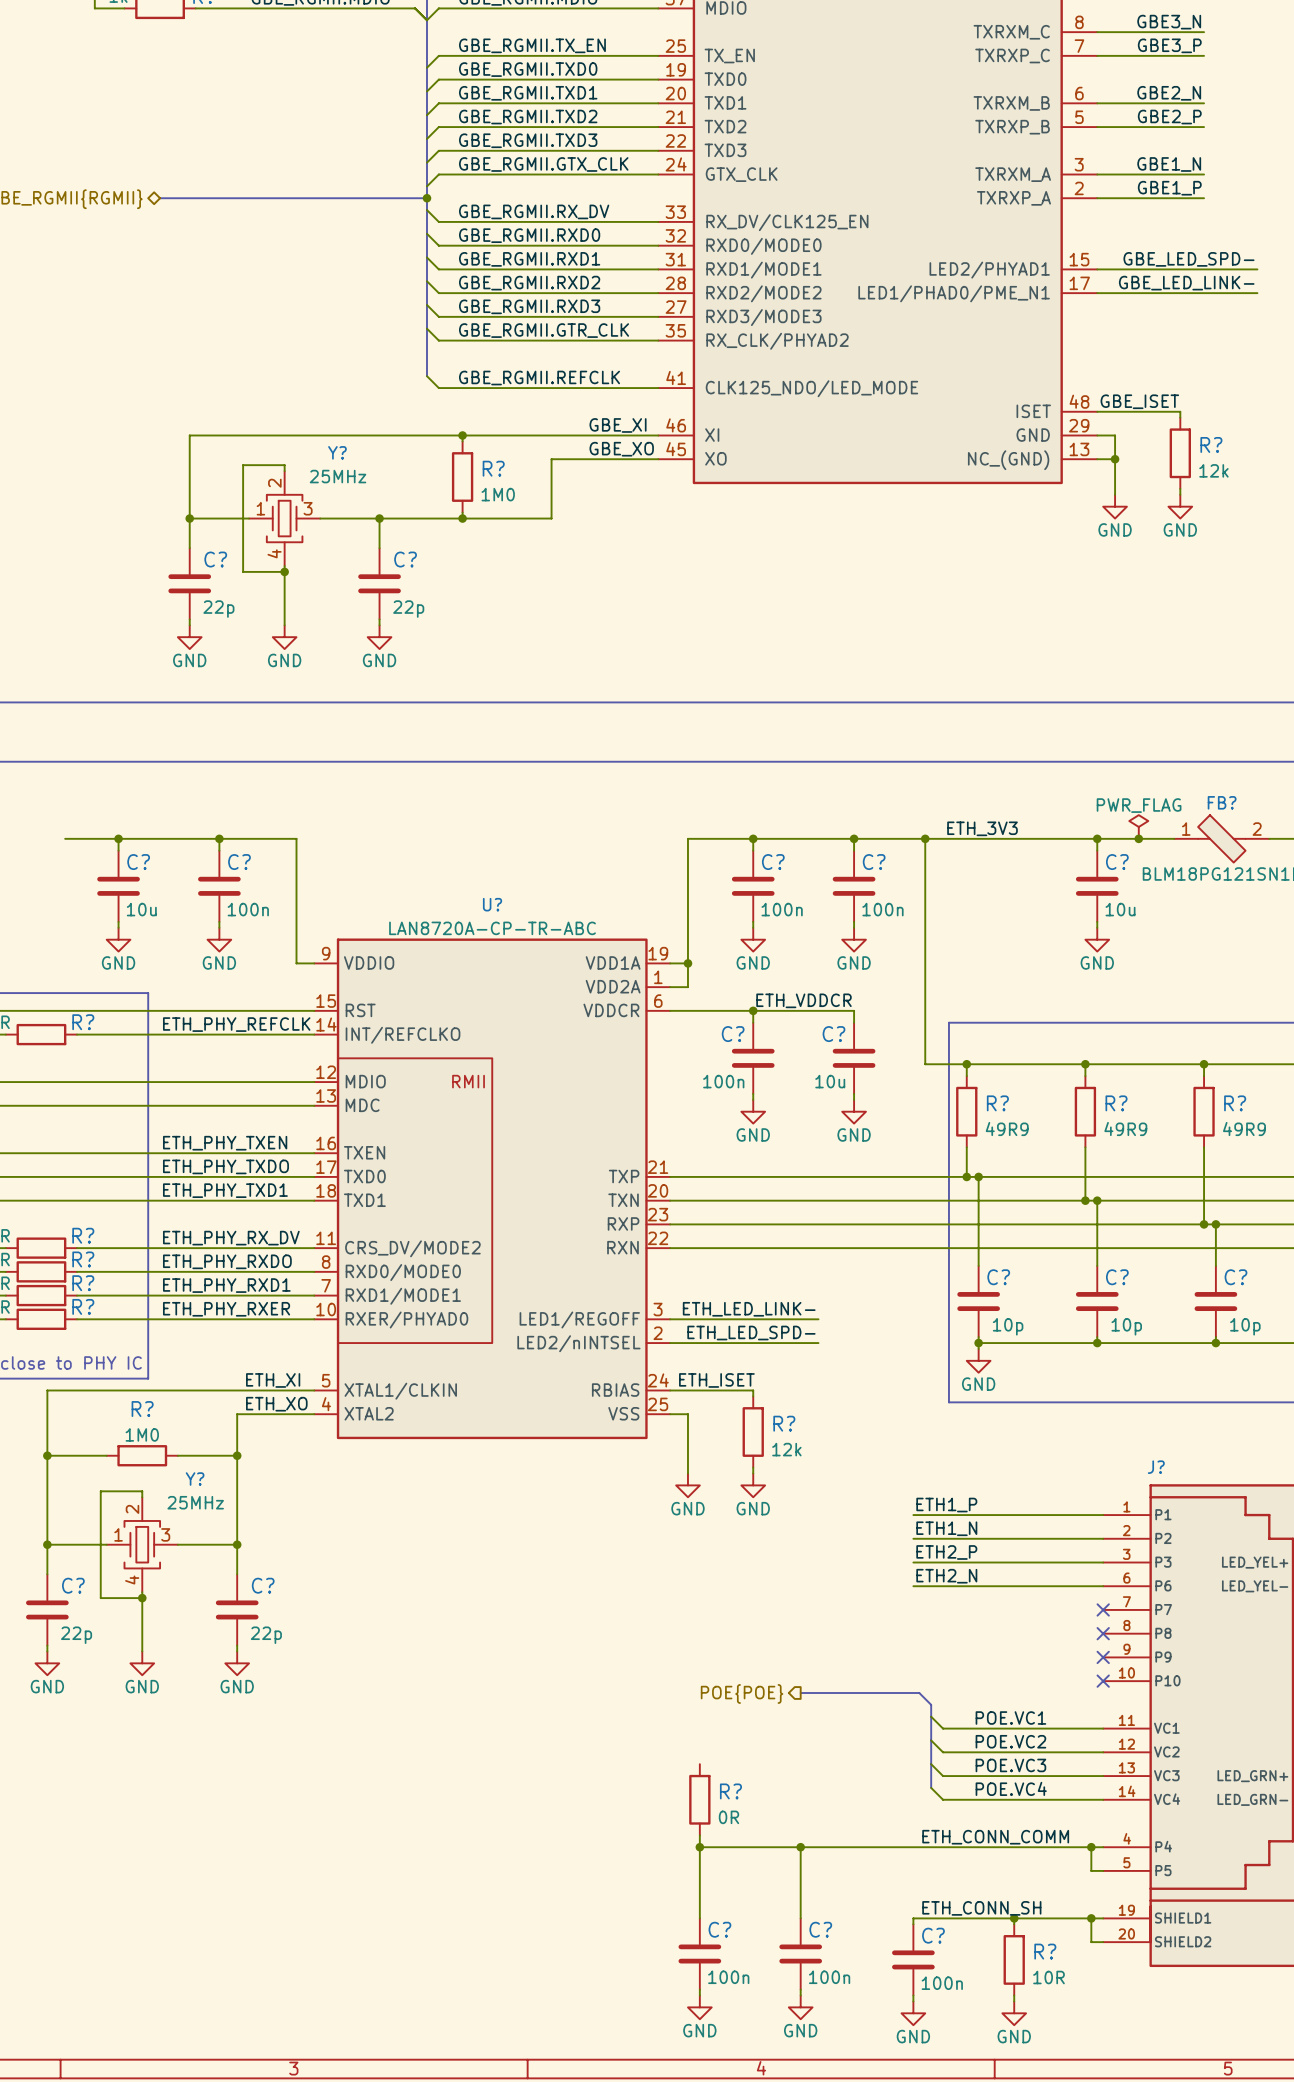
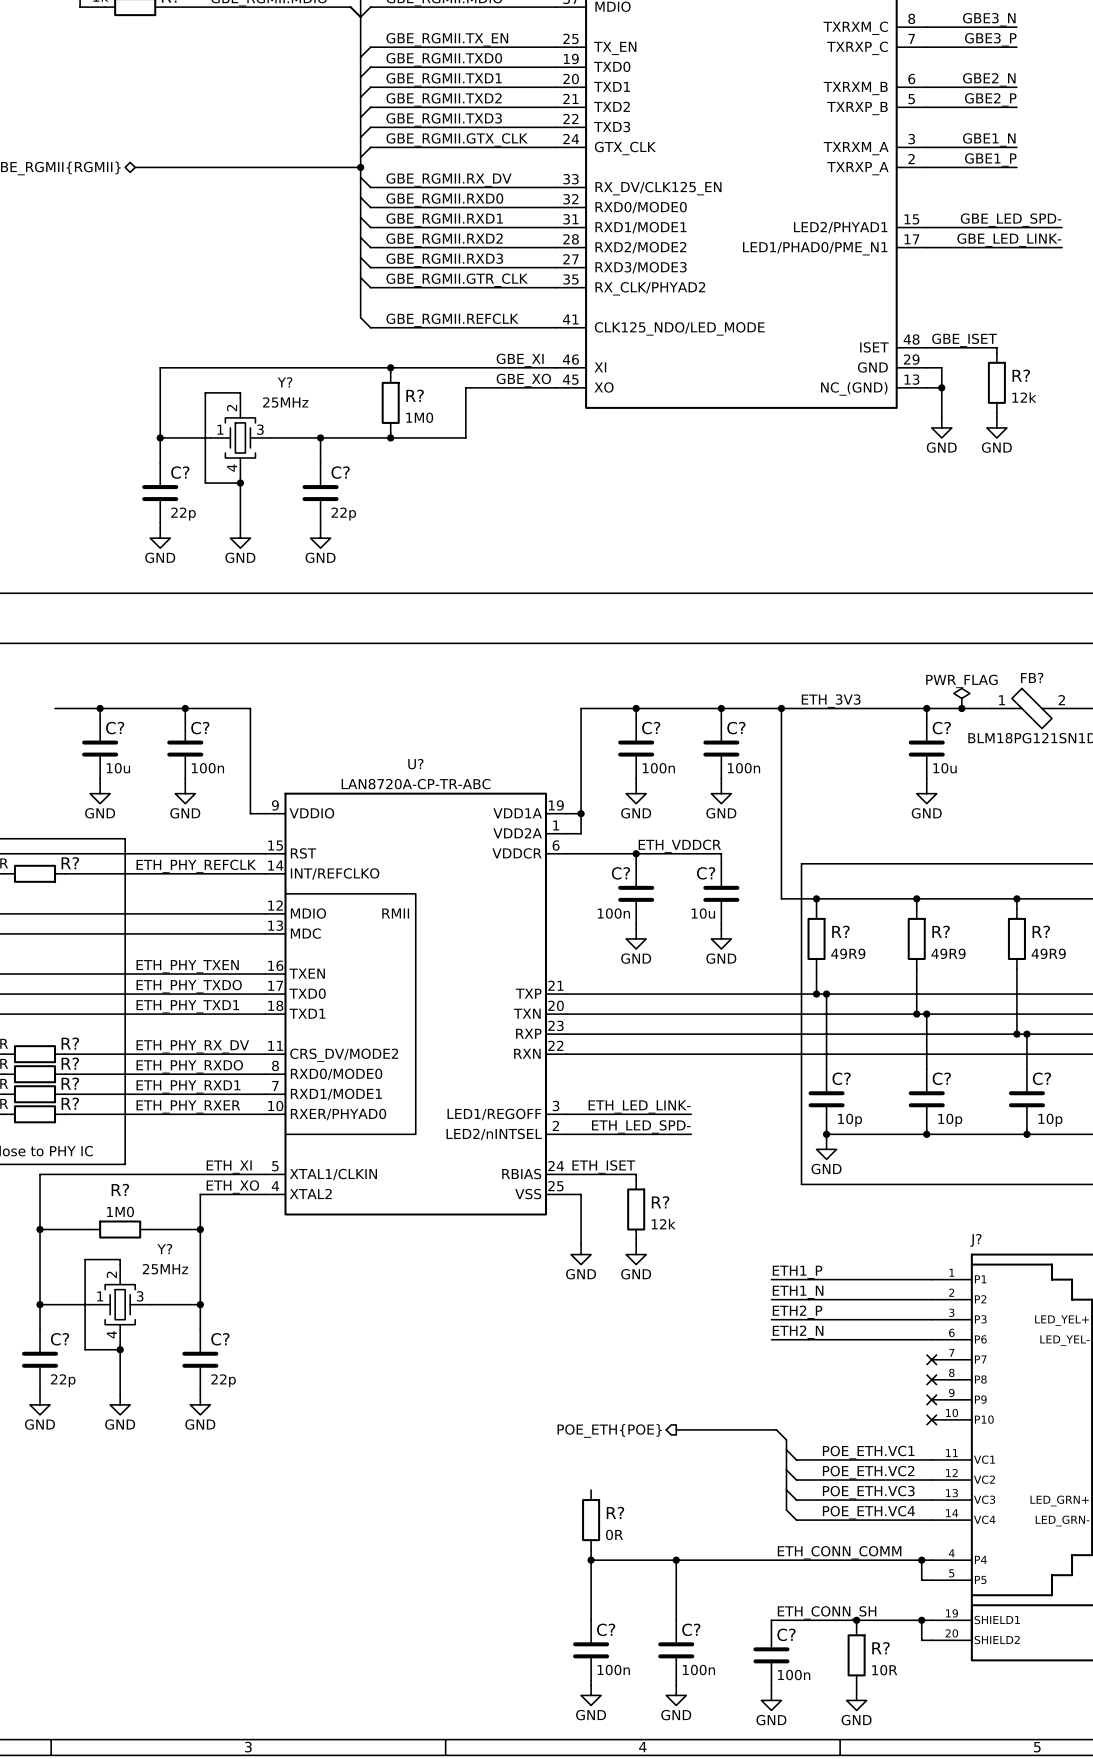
hierarchical label: POE{POE} (742, 1693) -> POE_ETH{POE} (609, 1430)
label: POE.VC1 (1010, 1718) -> POE_ETH.VC1 (868, 1452)
label: POE.VC2 (1010, 1741) -> POE_ETH.VC2 (868, 1472)
label: POE.VC3 (1010, 1765) -> POE_ETH.VC3 (868, 1492)
label: POE.VC4 (1011, 1788) -> POE_ETH.VC4 (868, 1512)

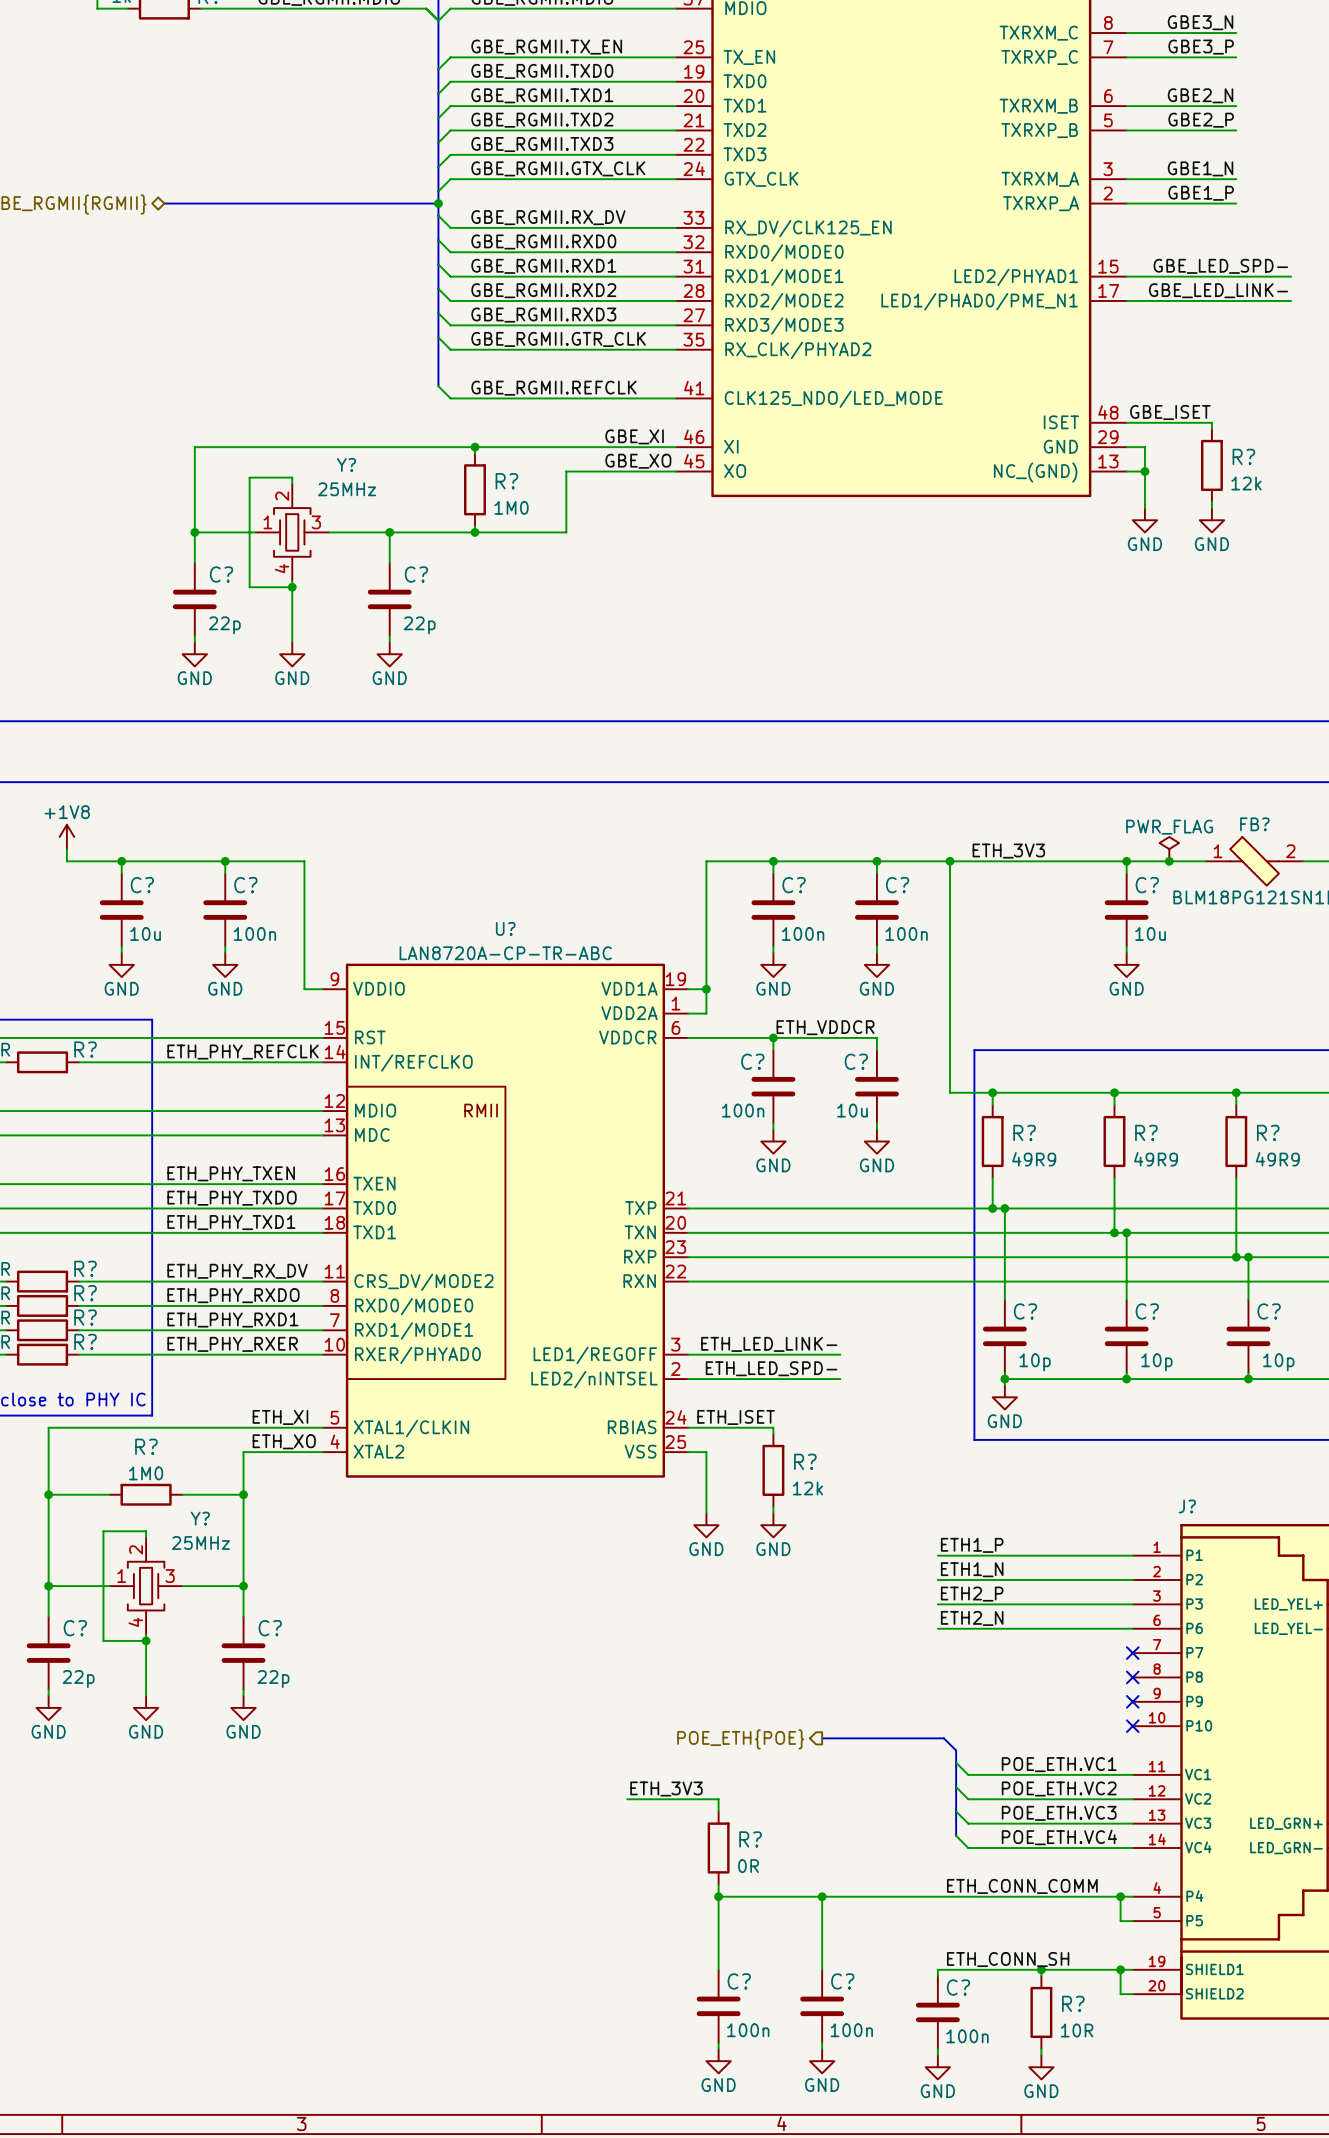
power symbol: none -> +1V8 (66, 836)
wire: none -> (66, 849) (66, 861)
label: none -> ETH_3V3 (666, 1788)
wire: none -> (627, 1799) (718, 1799) (718, 1811)

